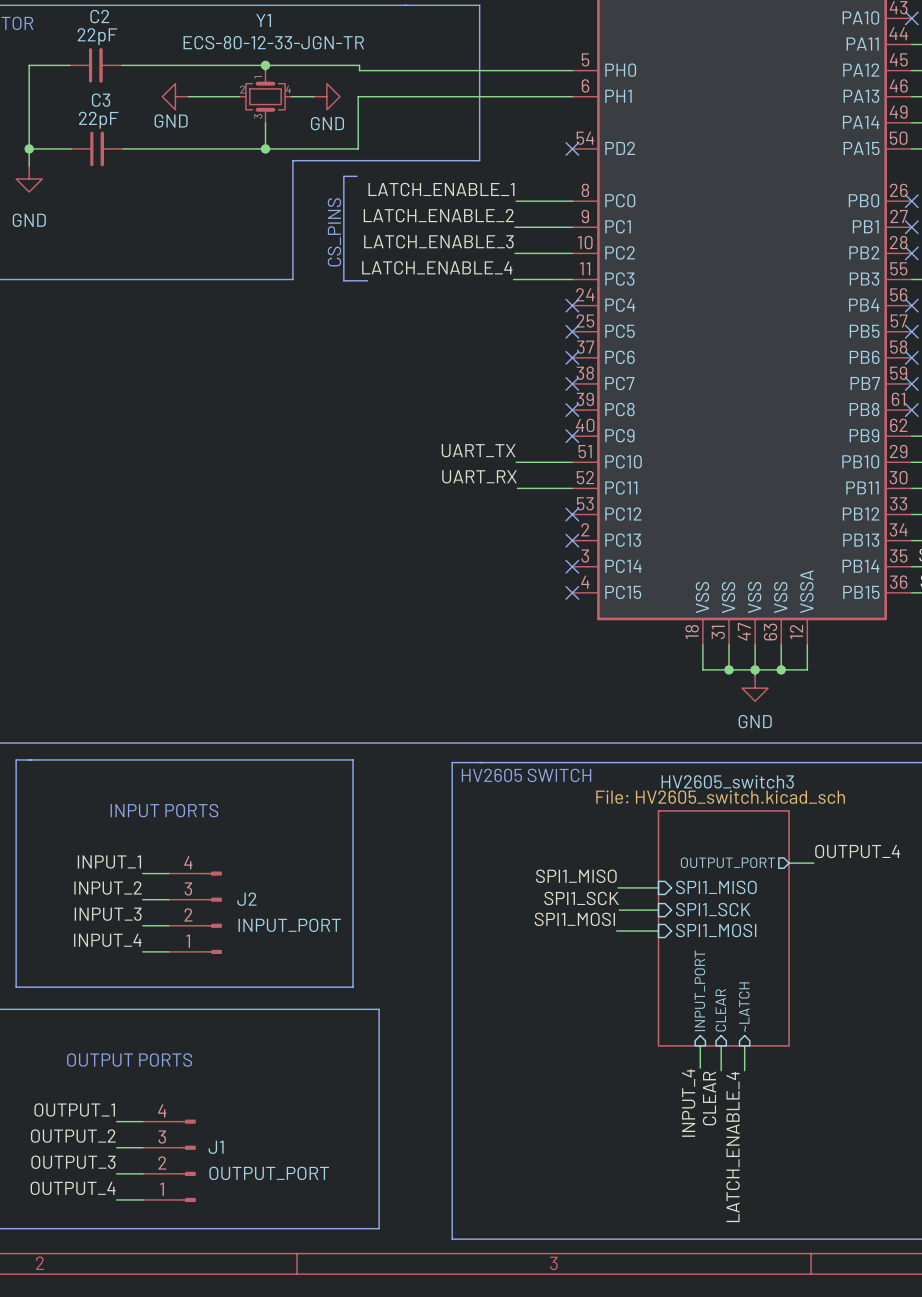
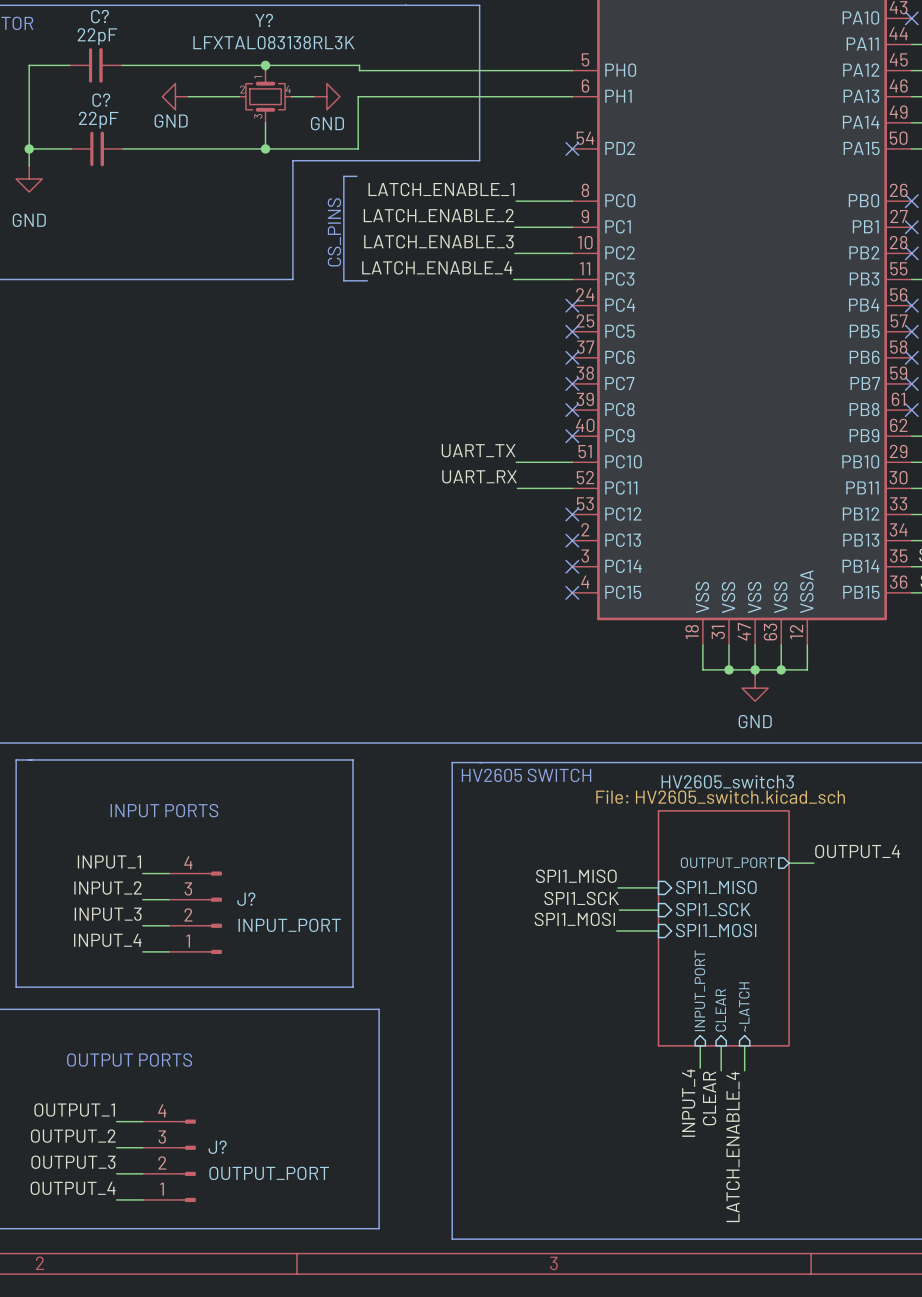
C2 name: C2 (99, 16) -> C? (99, 16)
Y1 name: Y1 (263, 20) -> Y? (264, 20)
Y1 value: ECS-80-12-33-JGN-TR (273, 42) -> LFXTAL083138RL3K (273, 42)
C3 name: C3 (101, 100) -> C? (101, 100)
J2 name: J2 (246, 899) -> J? (246, 899)
J1 name: J1 (216, 1147) -> J? (217, 1147)

